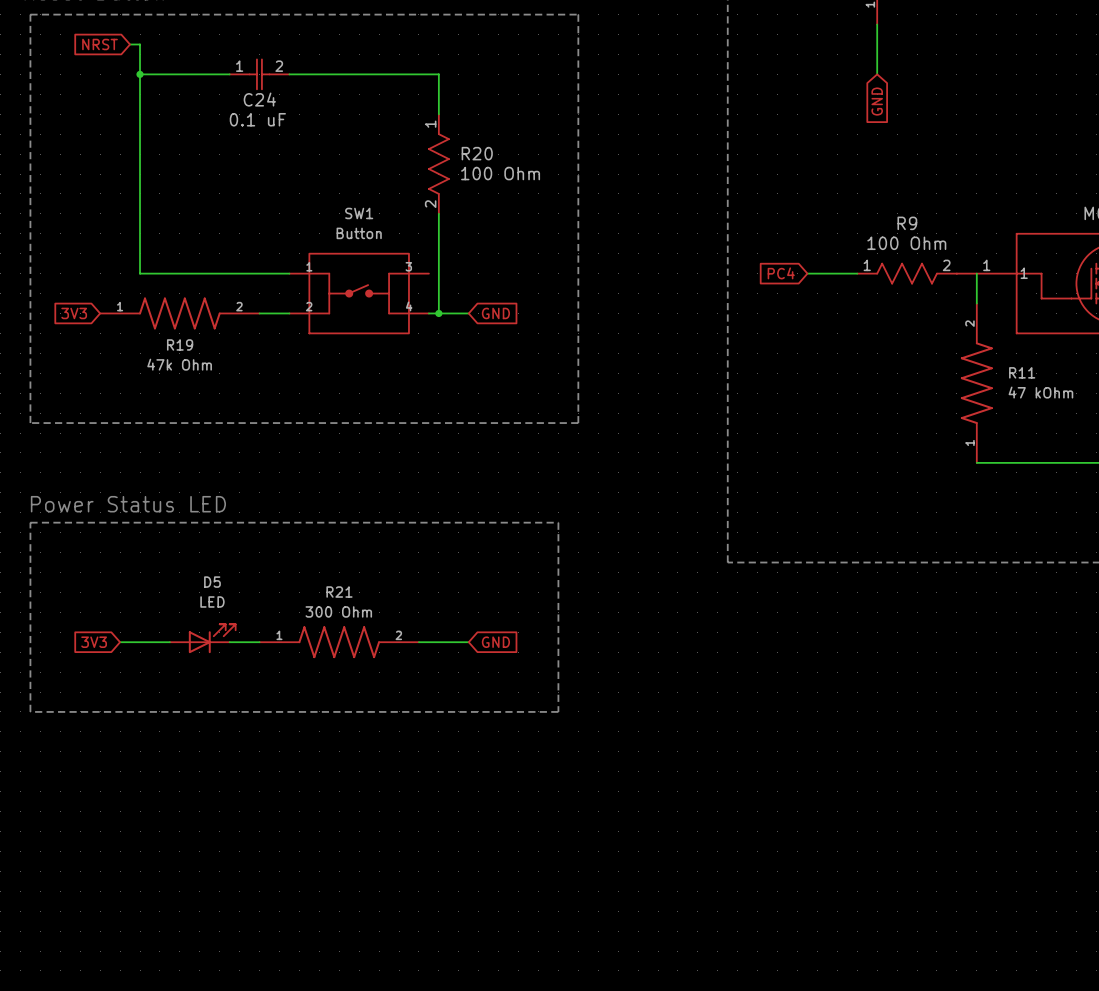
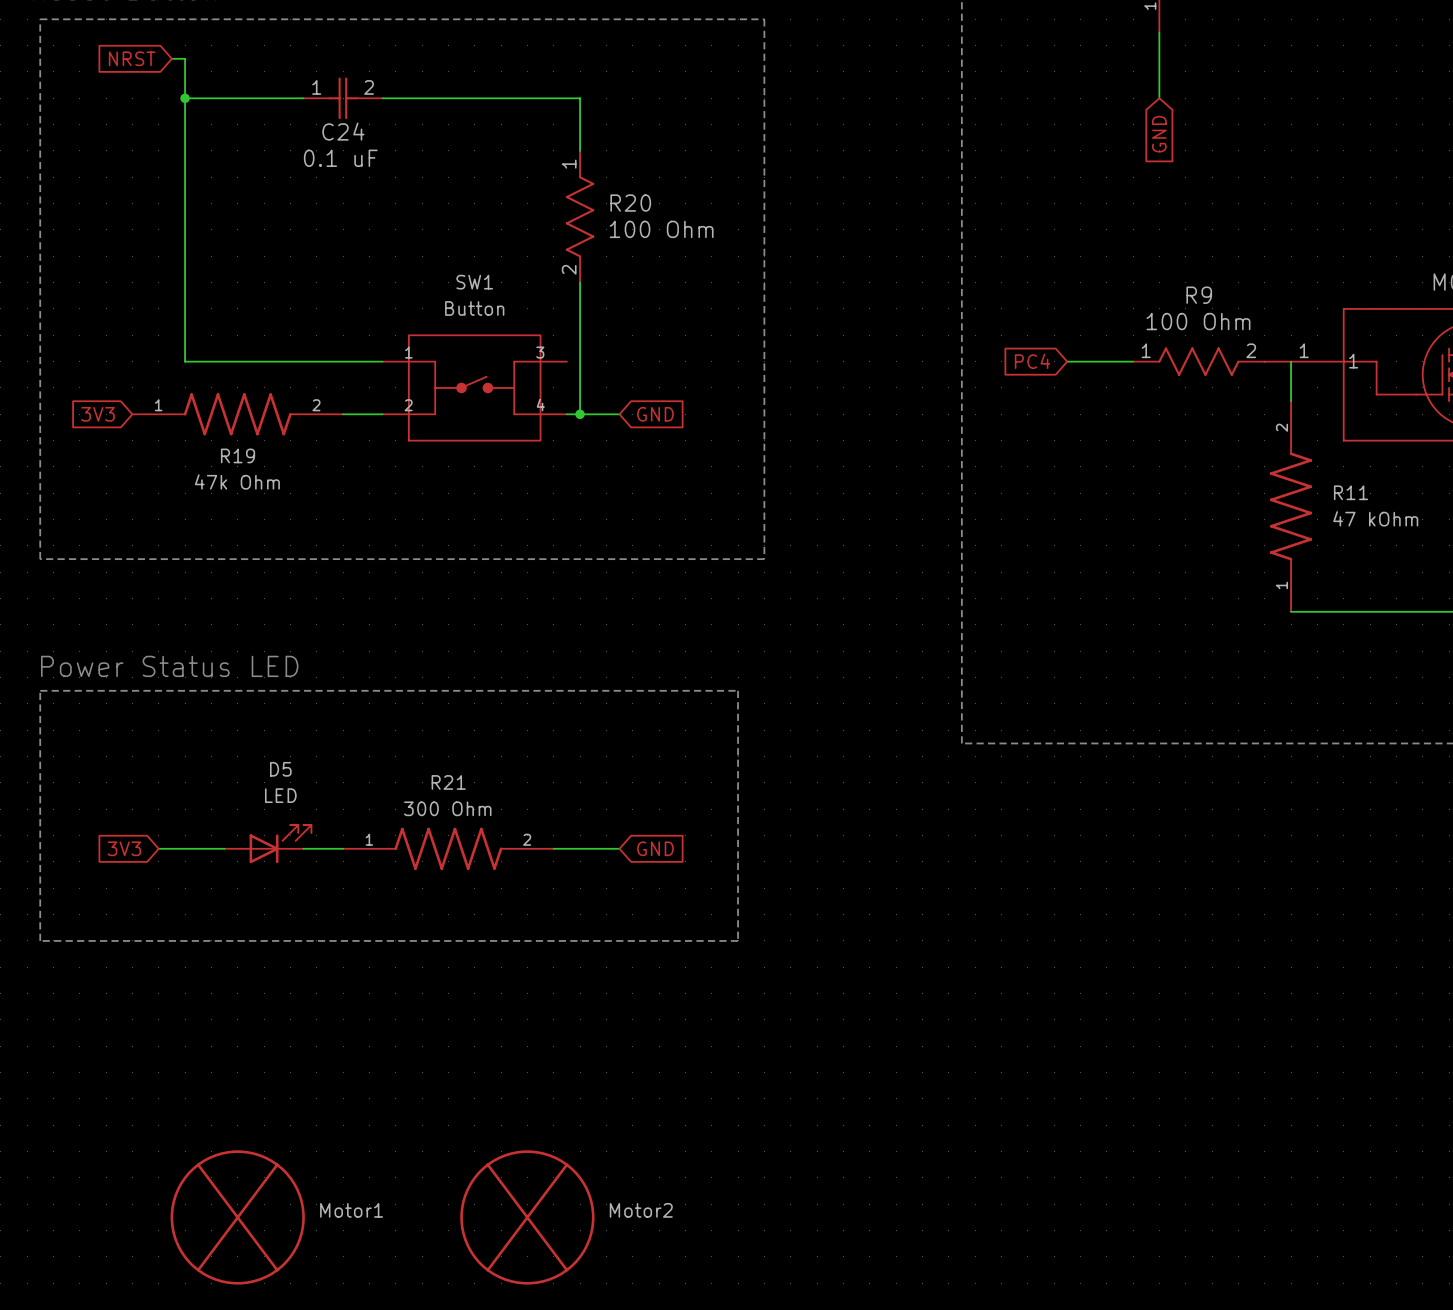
Motor1: none -> (237, 1217)
Motor2: none -> (527, 1217)

